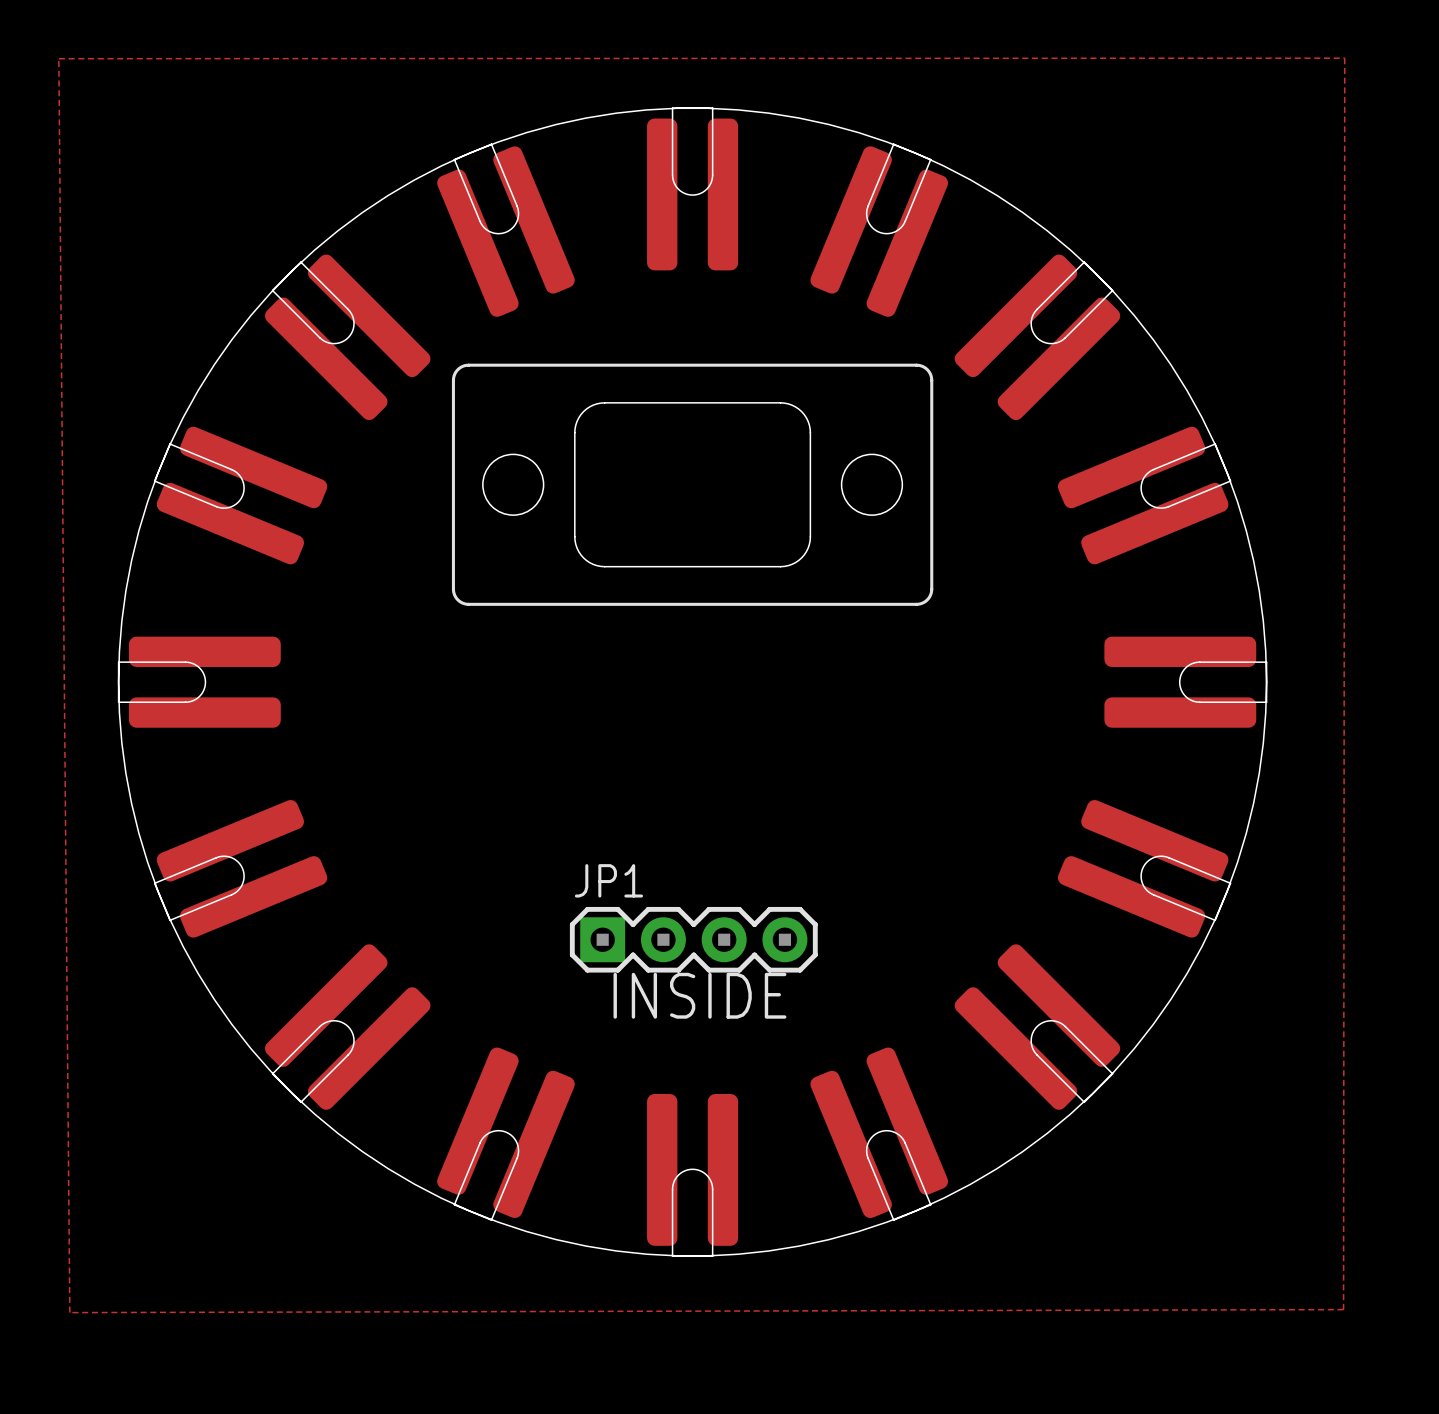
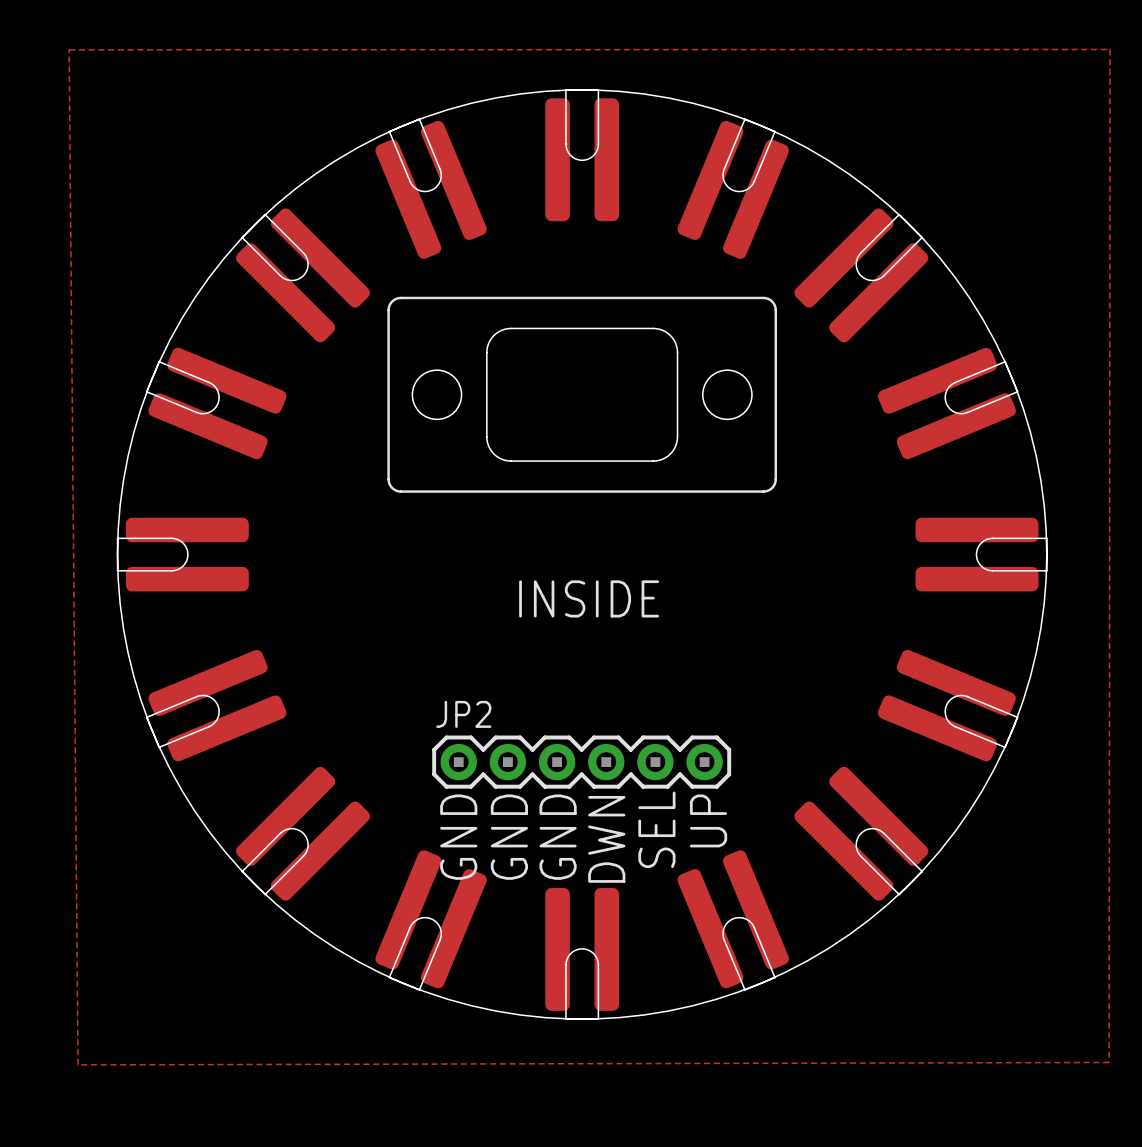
JP2: none -> (581, 762)
JP1: (693, 939) -> none
text position: INSIDE (699, 995) -> INSIDE (589, 598)
text: none -> UP (708, 820)
text: none -> SEL (656, 829)
text: none -> GND (458, 837)
text: none -> GND (509, 837)
text: none -> GND (558, 837)
text: none -> DWN (606, 839)

